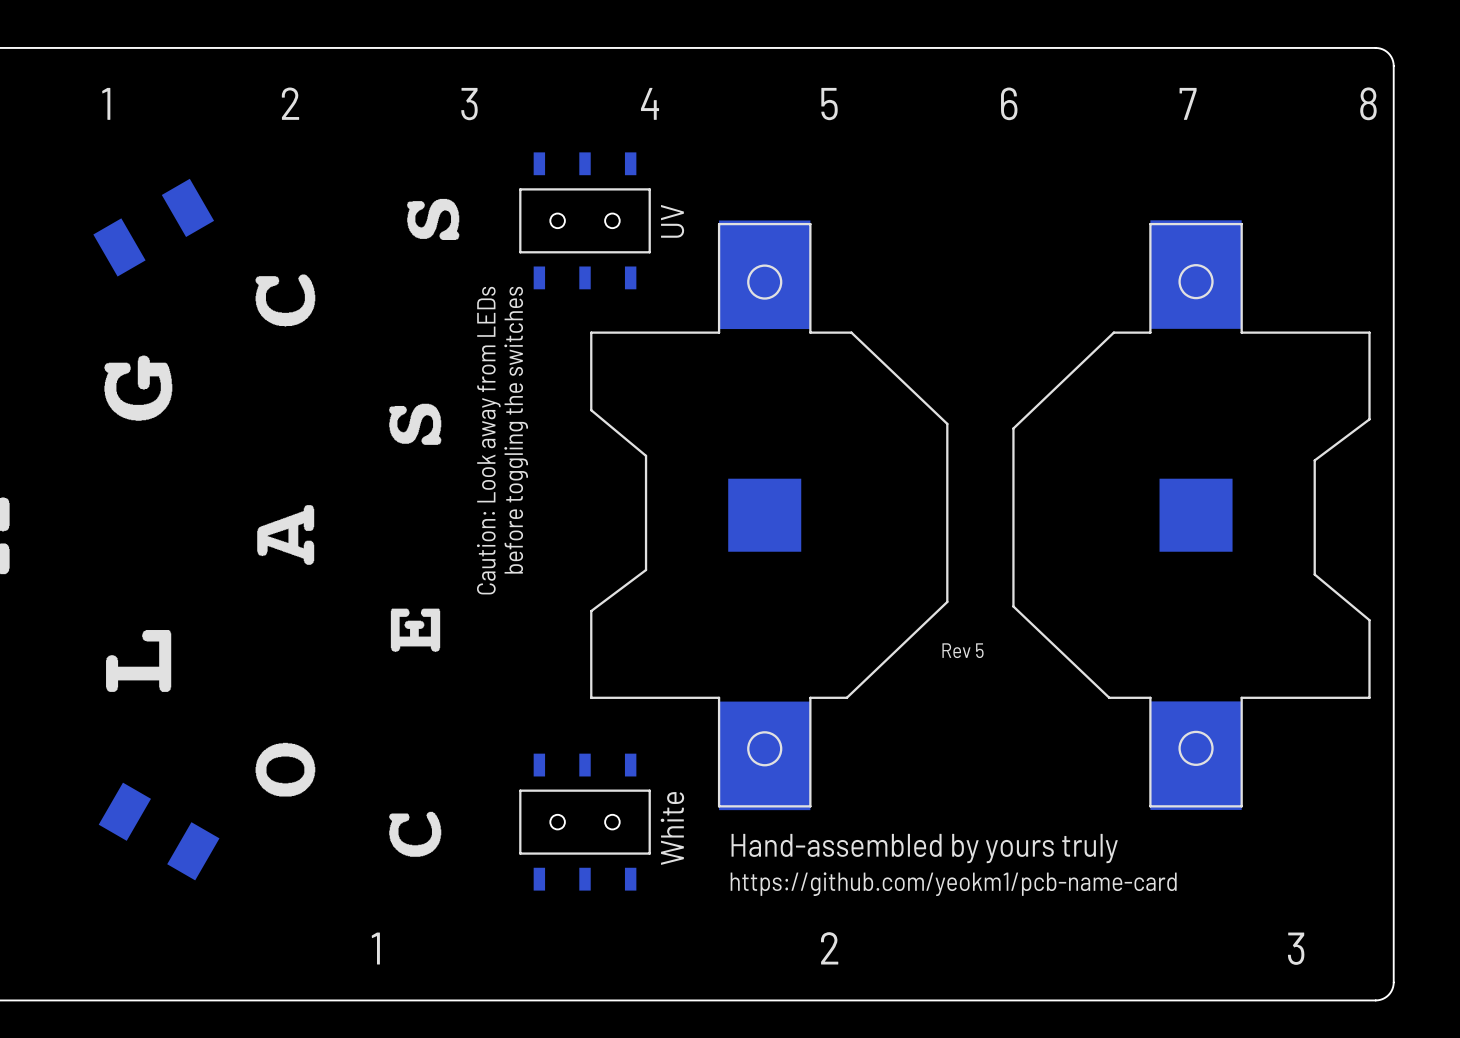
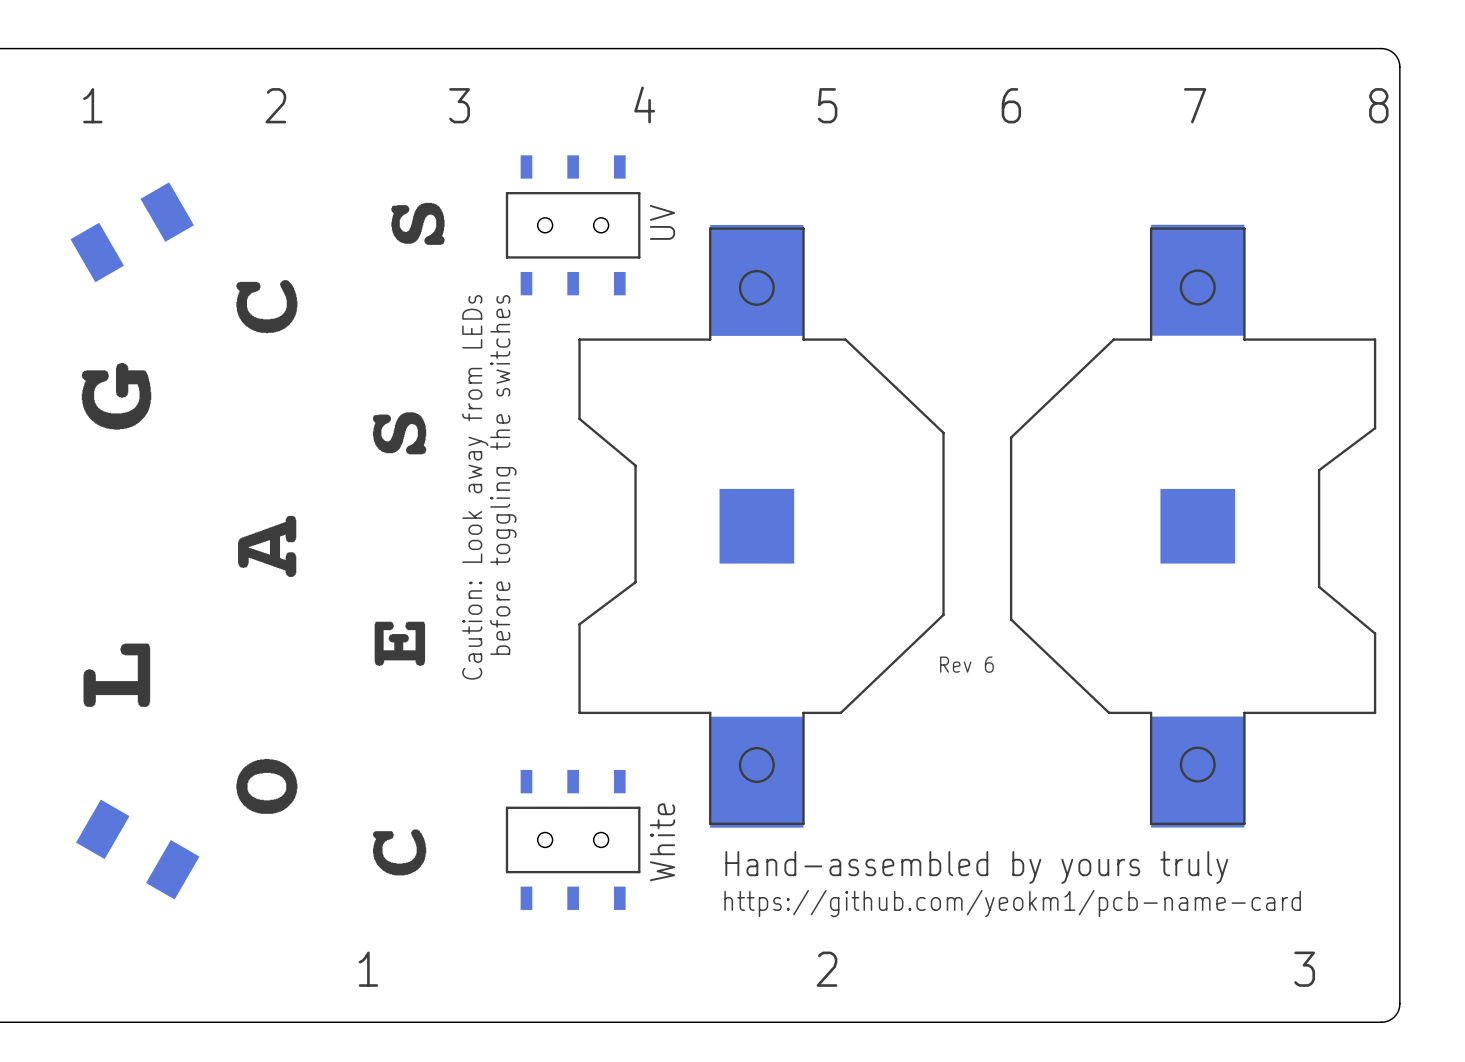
text: Rev 5 (962, 650) -> Rev 6 (966, 664)

